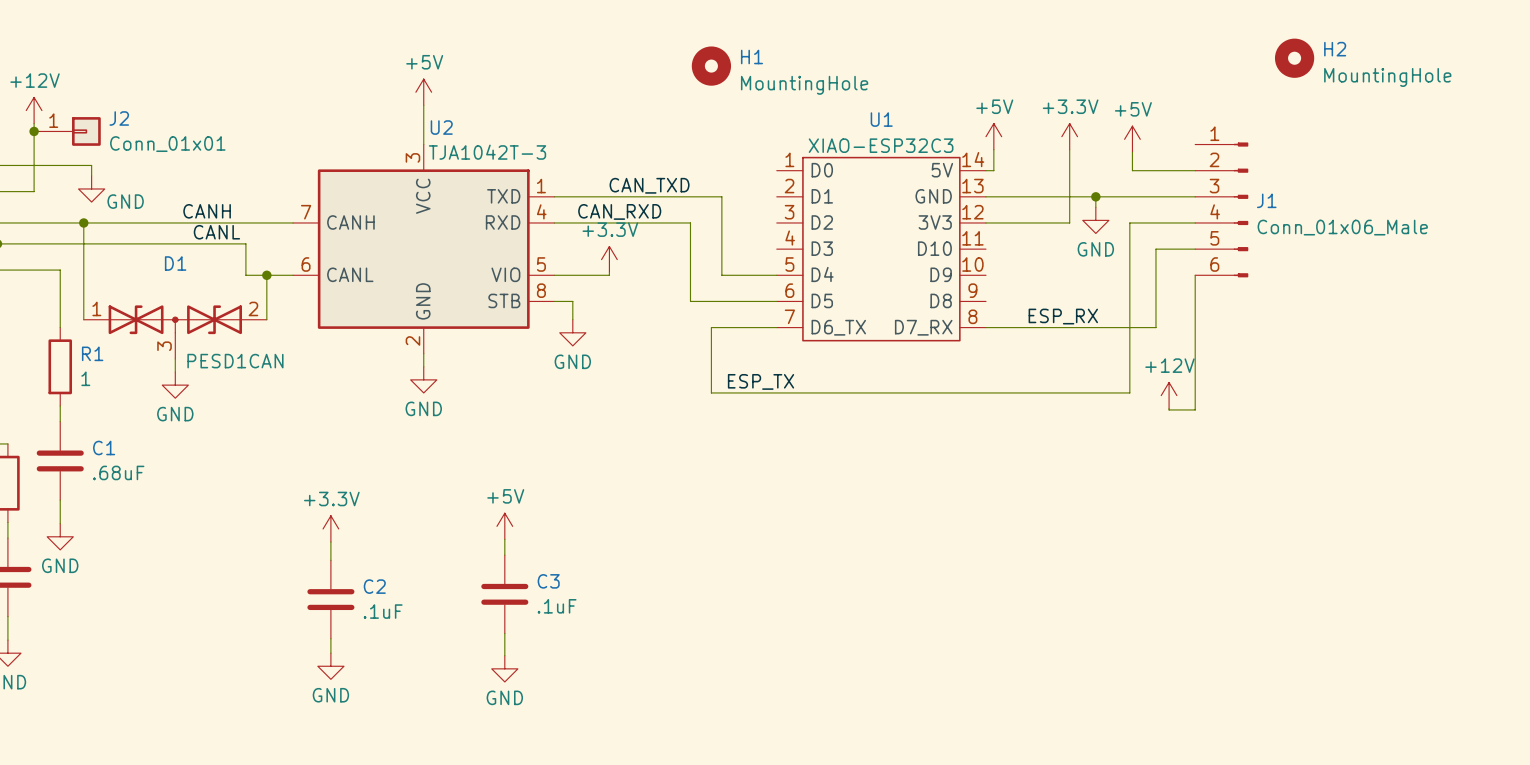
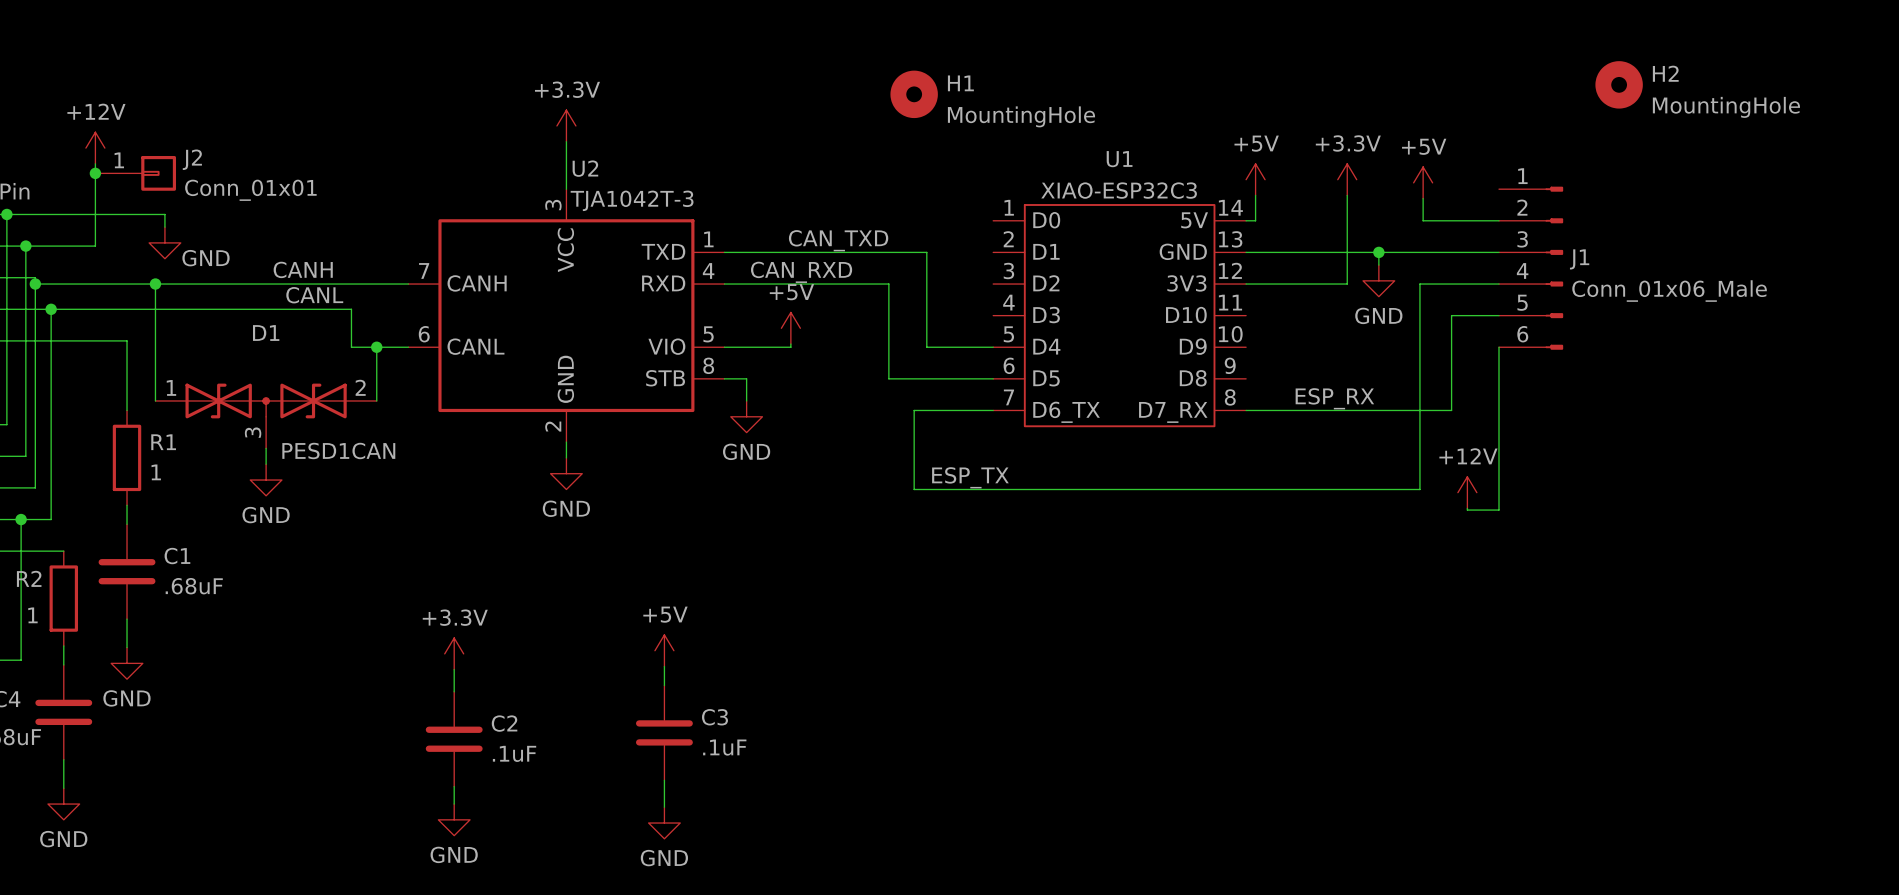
power symbol: +5V (423, 92) -> +3.3V (566, 125)
power symbol: +3.3V (609, 259) -> +5V (790, 328)

